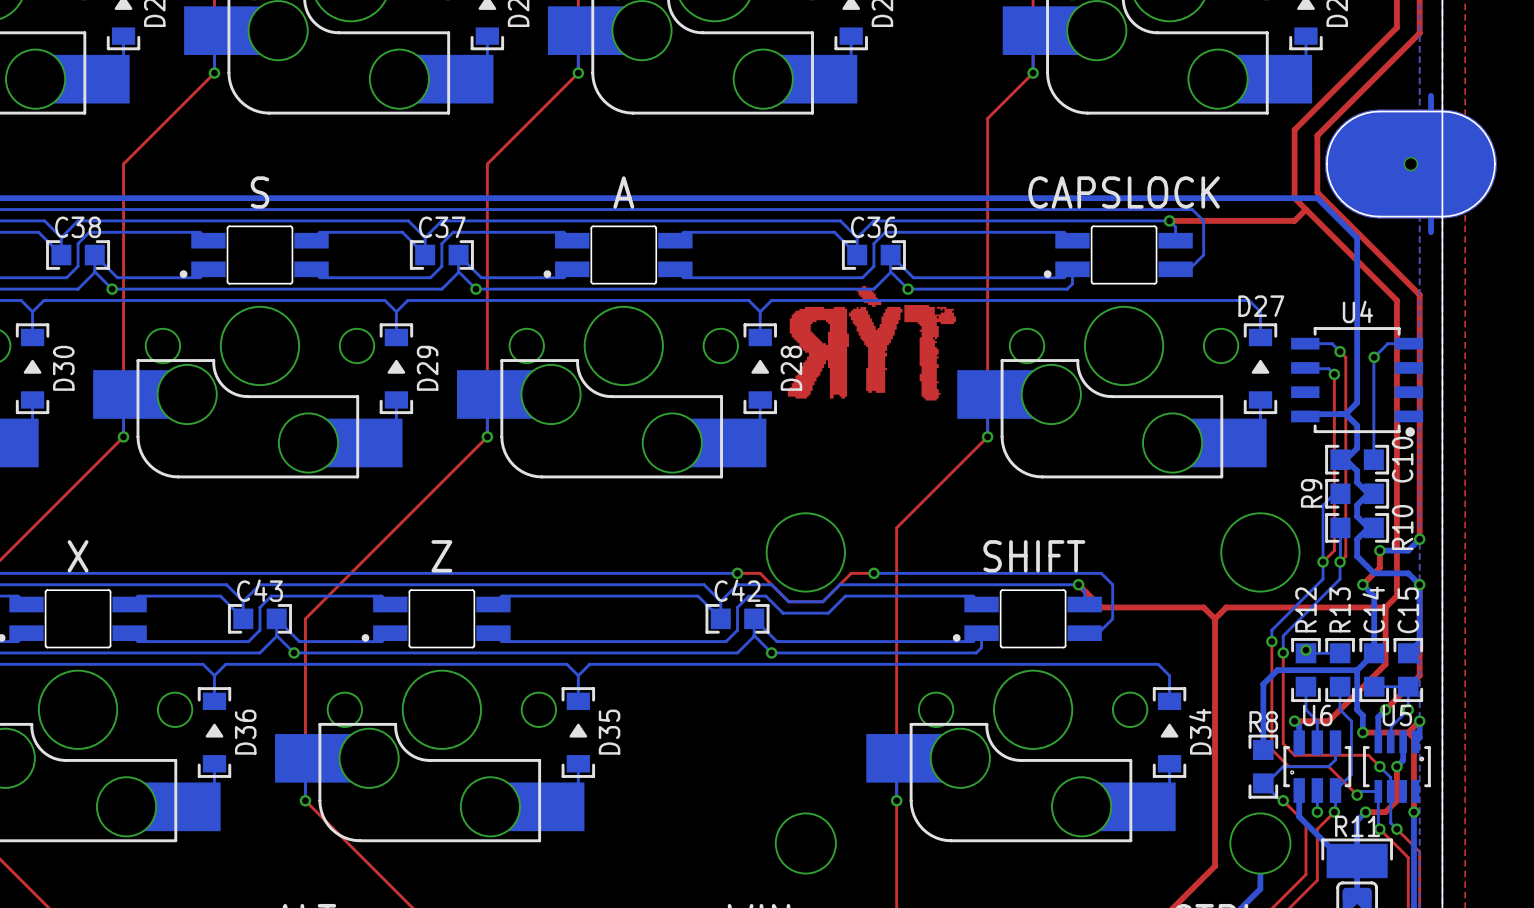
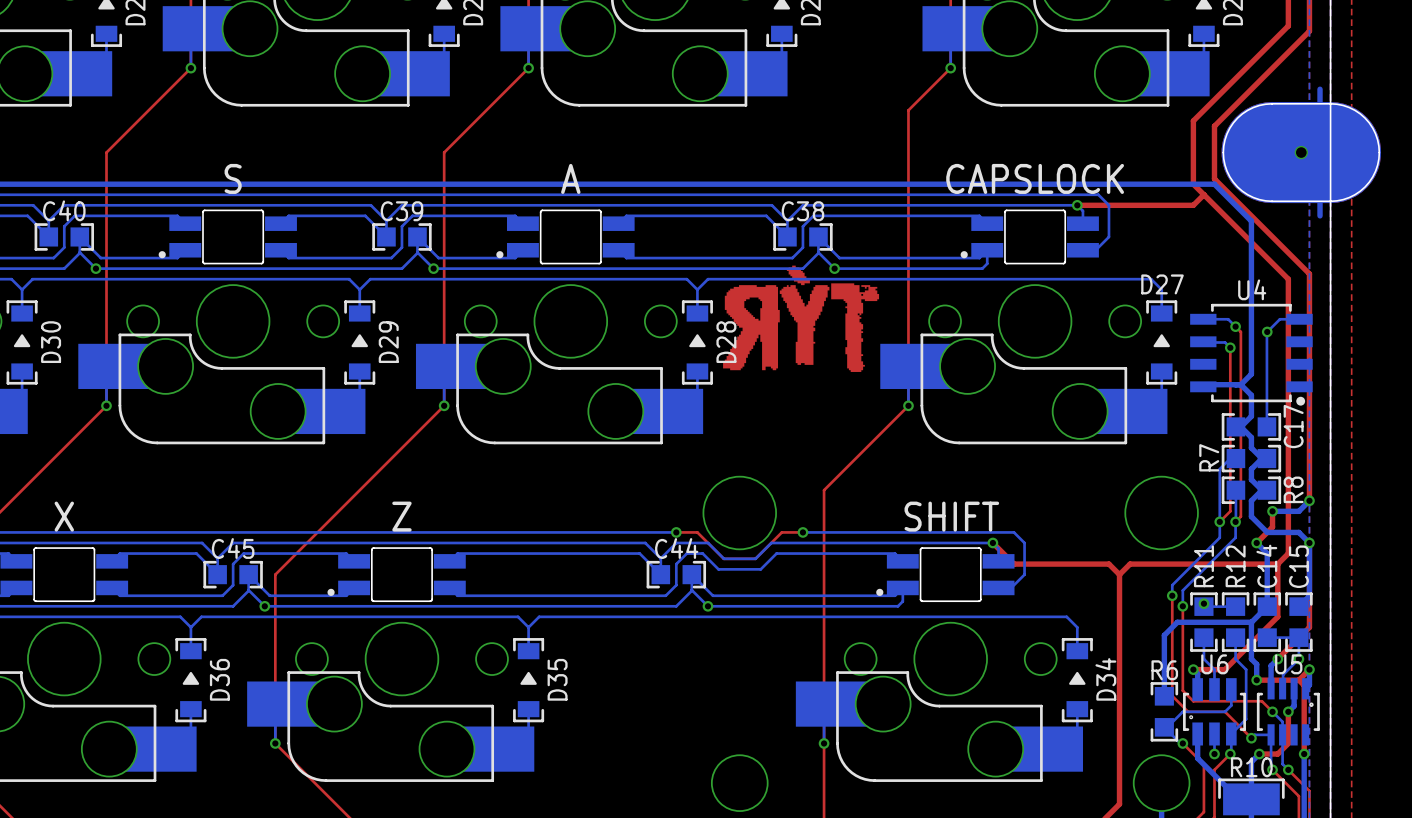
C38 name: C38 (78, 227) -> C40 (64, 210)
C37 name: C37 (442, 227) -> C39 (401, 211)
C36 name: C36 (873, 227) -> C38 (802, 211)
C10 name: C10 (1402, 459) -> C17 (1293, 426)
R9 name: R9 (1311, 493) -> R7 (1209, 457)
R10 name: R10 (1402, 527) -> R8 (1293, 489)
C43 name: C43 (259, 590) -> C45 (233, 548)
C42 name: C42 (737, 590) -> C44 (676, 548)
R12 name: R12 (1305, 609) -> R11 (1203, 566)
R13 name: R13 (1340, 609) -> R12 (1235, 566)
R8 name: R8 (1263, 721) -> R6 (1164, 670)
R11 name: R11 (1357, 826) -> R10 (1251, 767)

